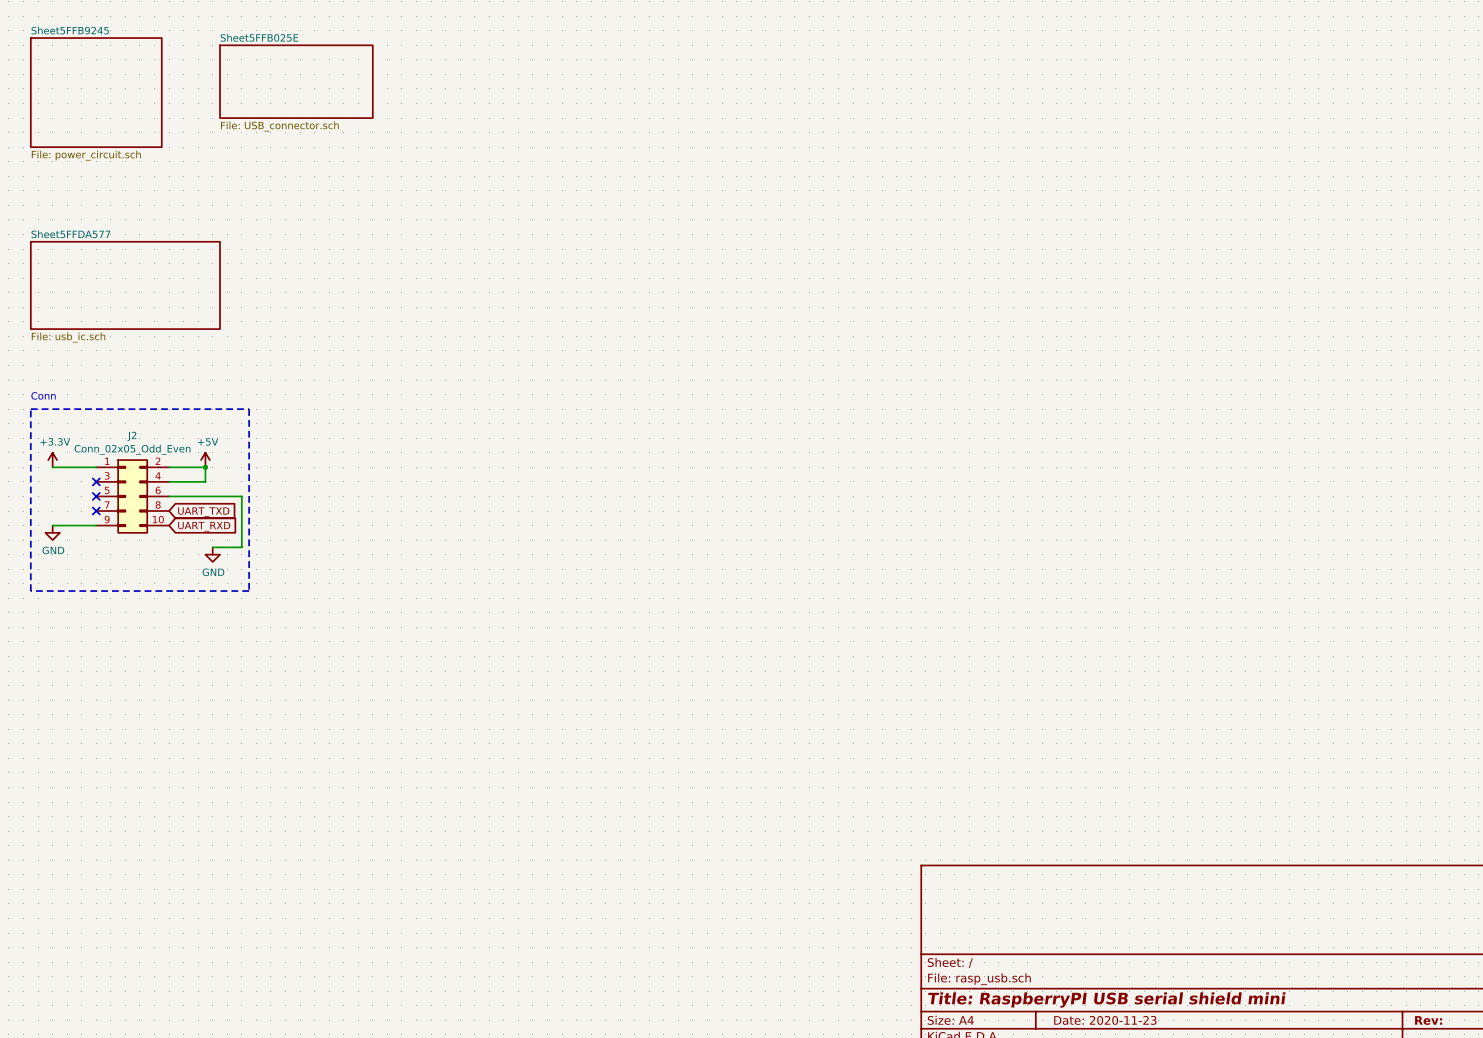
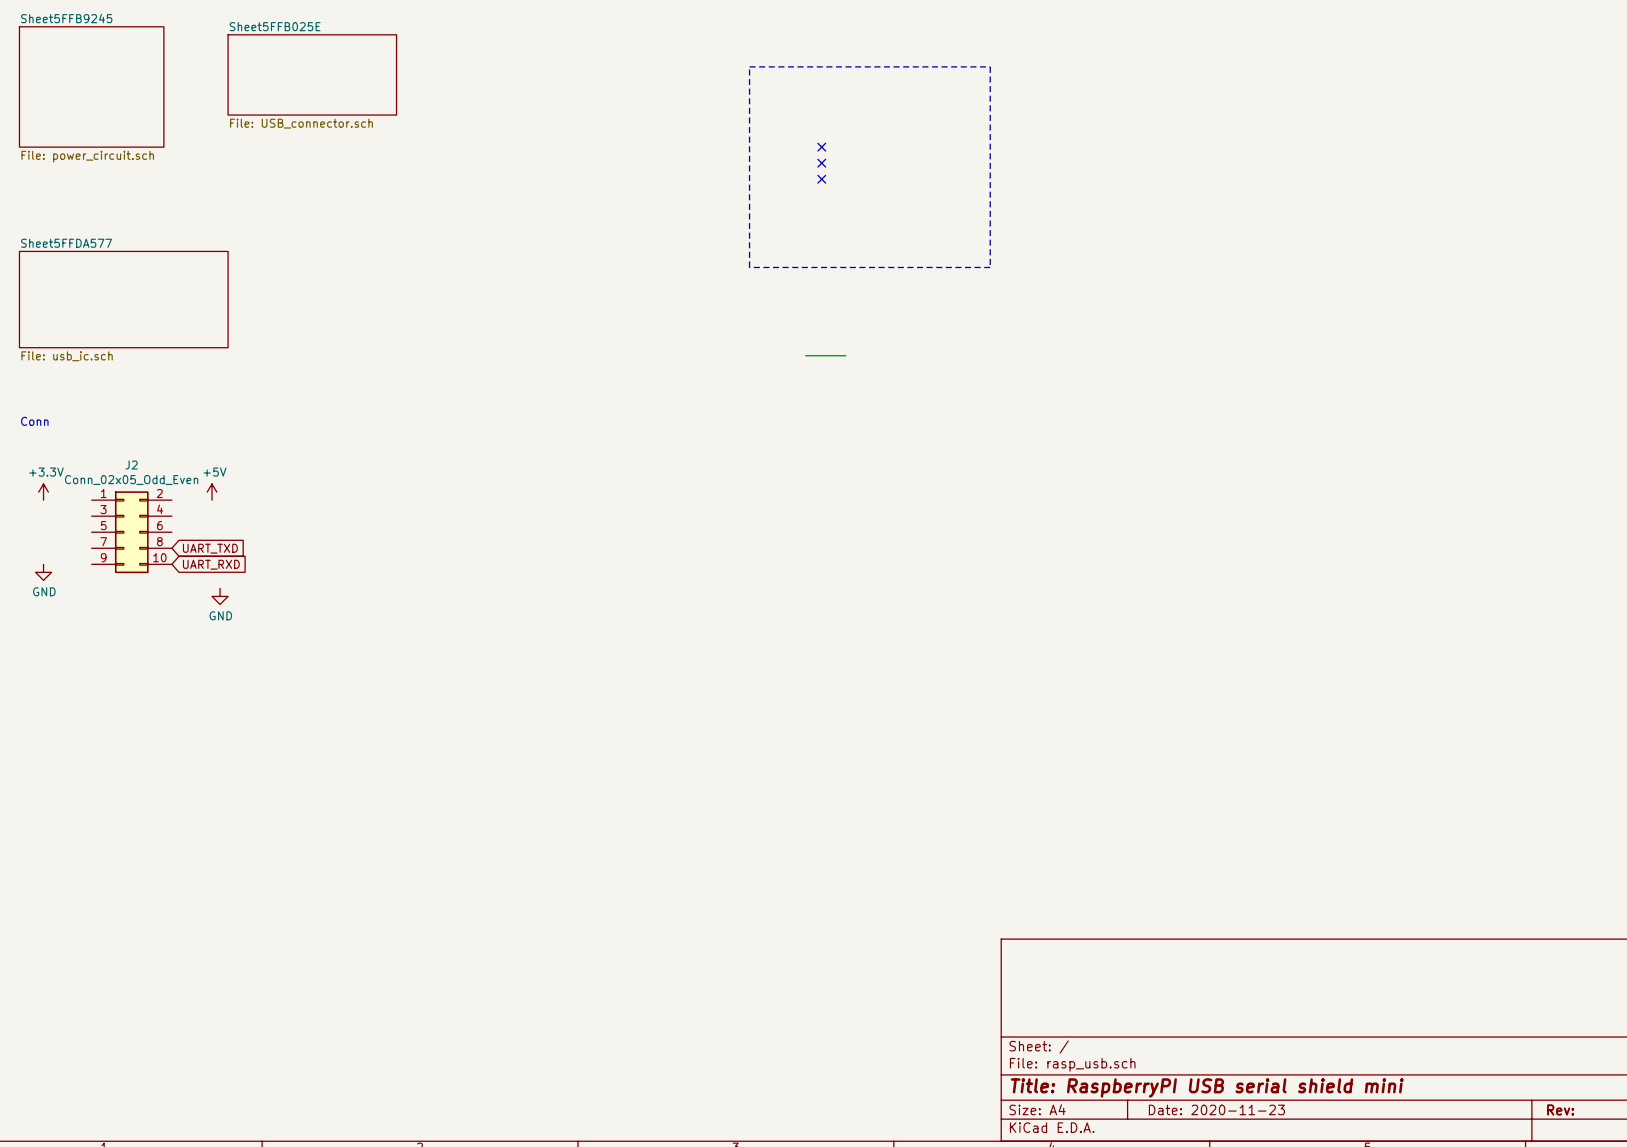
line: none -> (749, 66) (990, 66) (990, 267) (749, 267) (749, 66)
no-connect mark: none -> (821, 147)
no-connect mark: none -> (821, 163)
no-connect mark: none -> (821, 179)
wire: none -> (805, 355) (845, 355)
line: (30, 409) (249, 409) (249, 591) (30, 591) (30, 409) -> none
wire: (52, 467) (96, 467) -> none
wire: (169, 467) (205, 467) (205, 481) (169, 481) -> none
junction: (205, 467) -> none
no-connect mark: (96, 481) -> none
no-connect mark: (96, 496) -> none
wire: (169, 496) (241, 496) (241, 547) (212, 547) -> none
no-connect mark: (96, 511) -> none
wire: (52, 525) (96, 525) -> none

